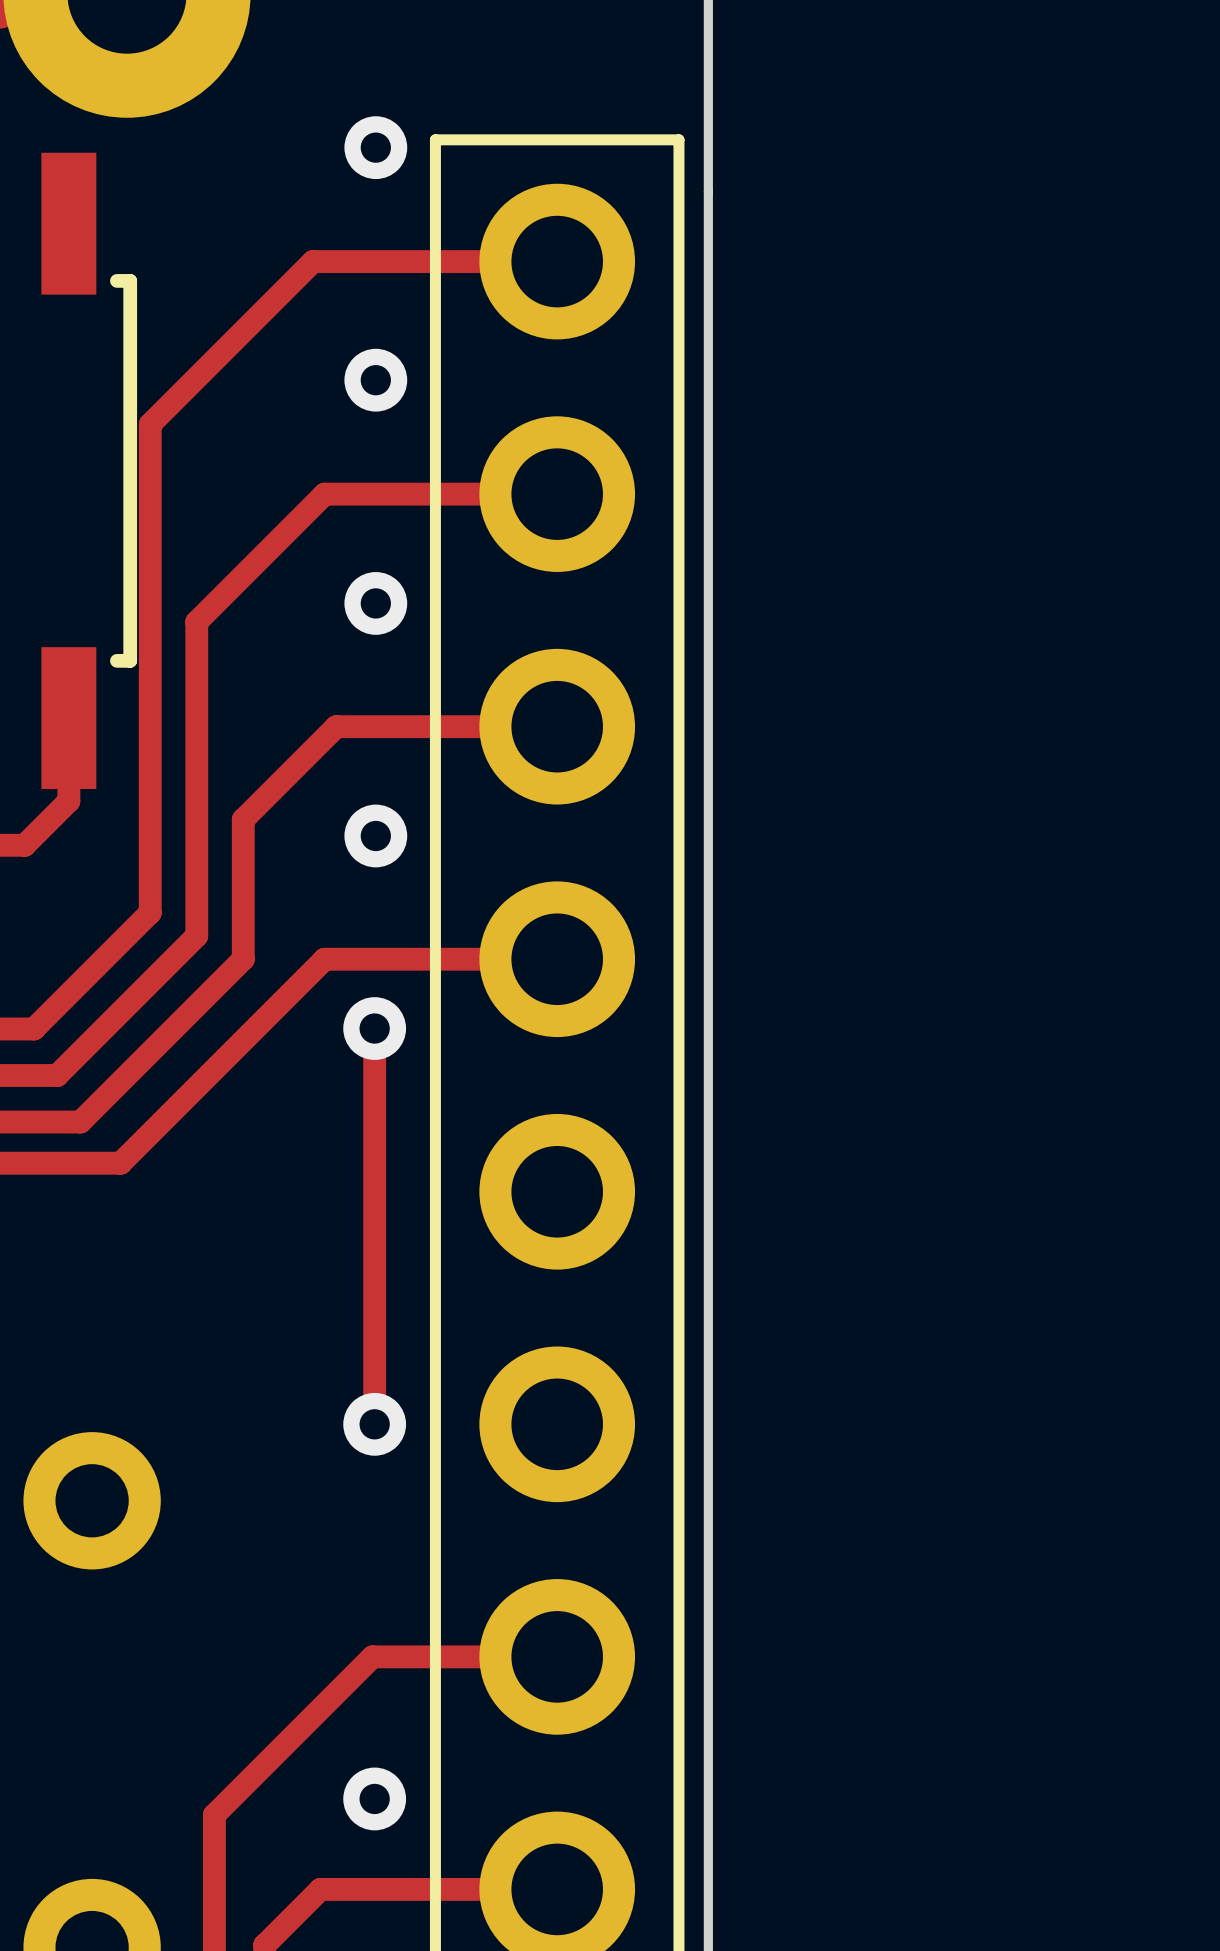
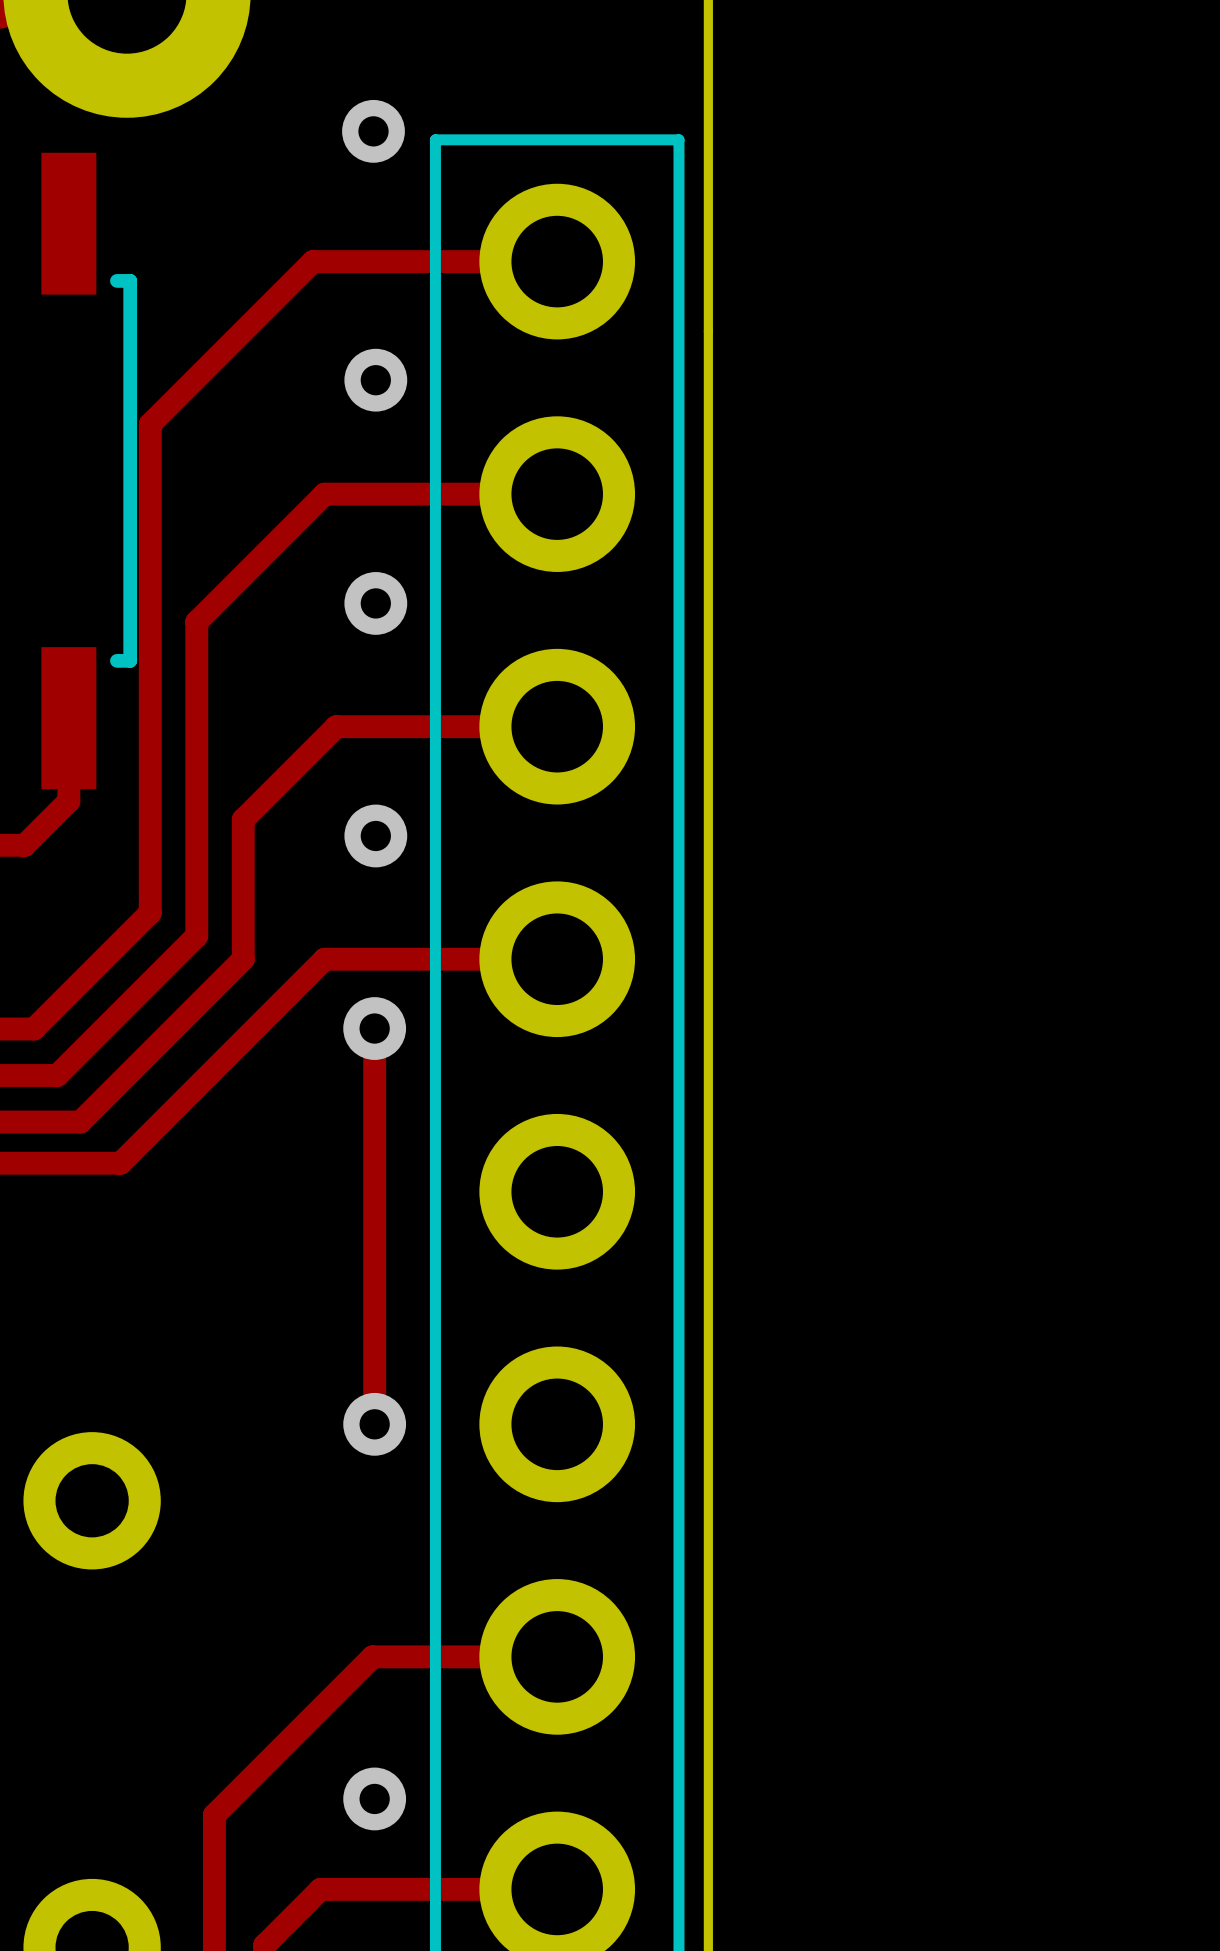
via position: (375, 147) -> (373, 131)

